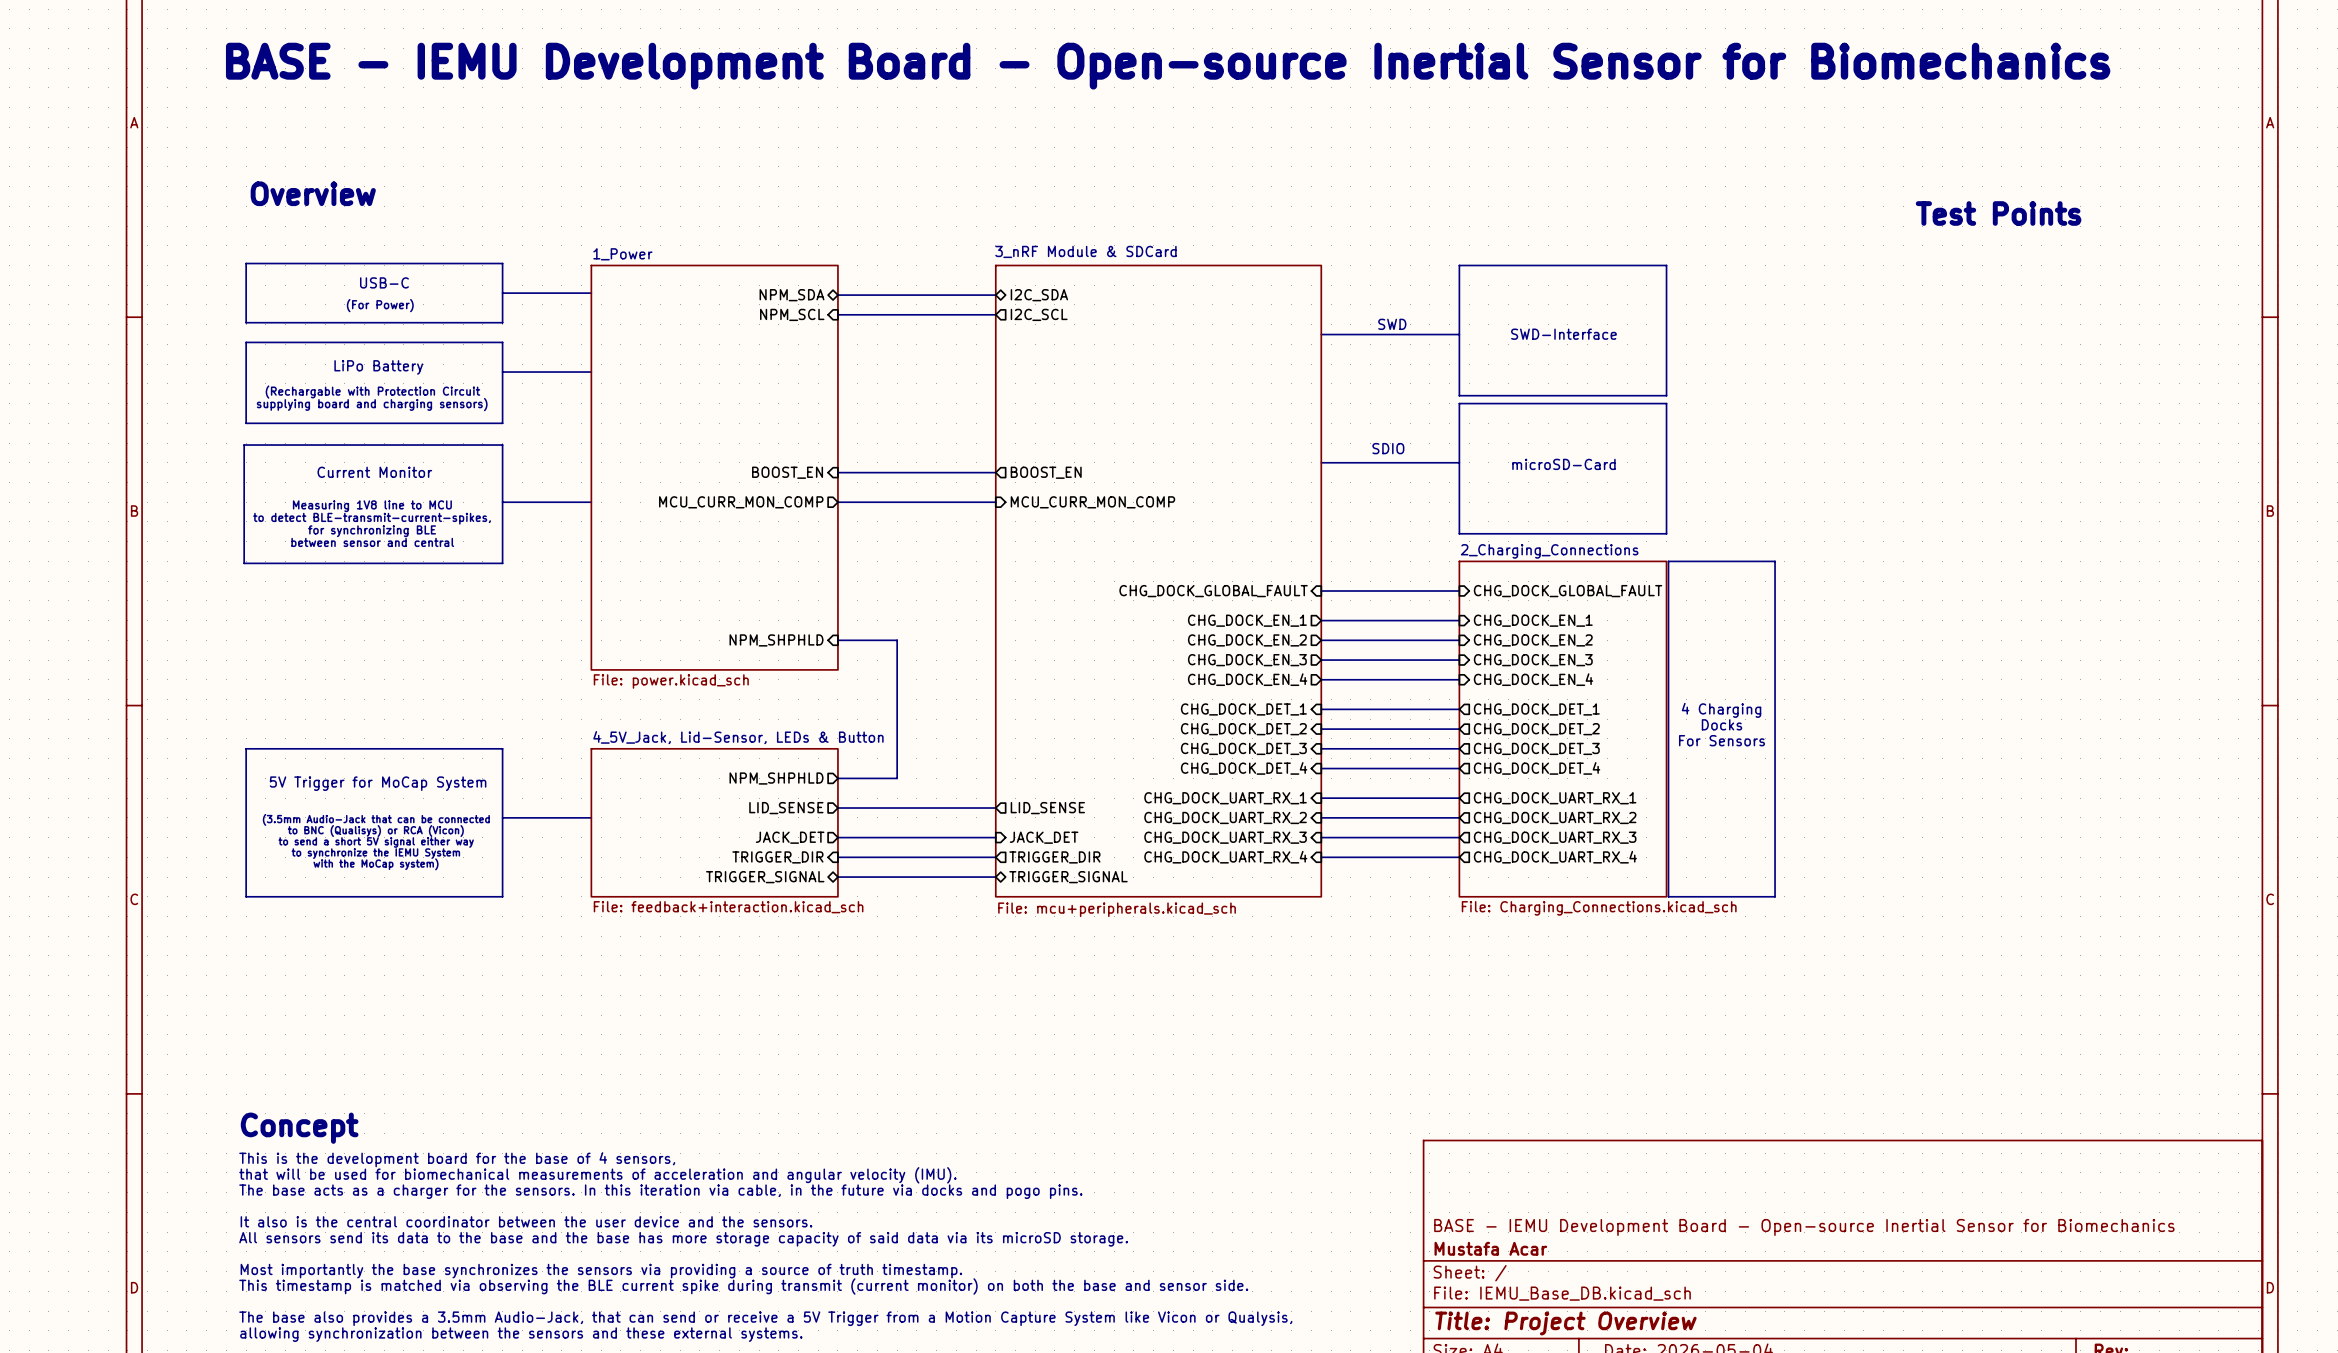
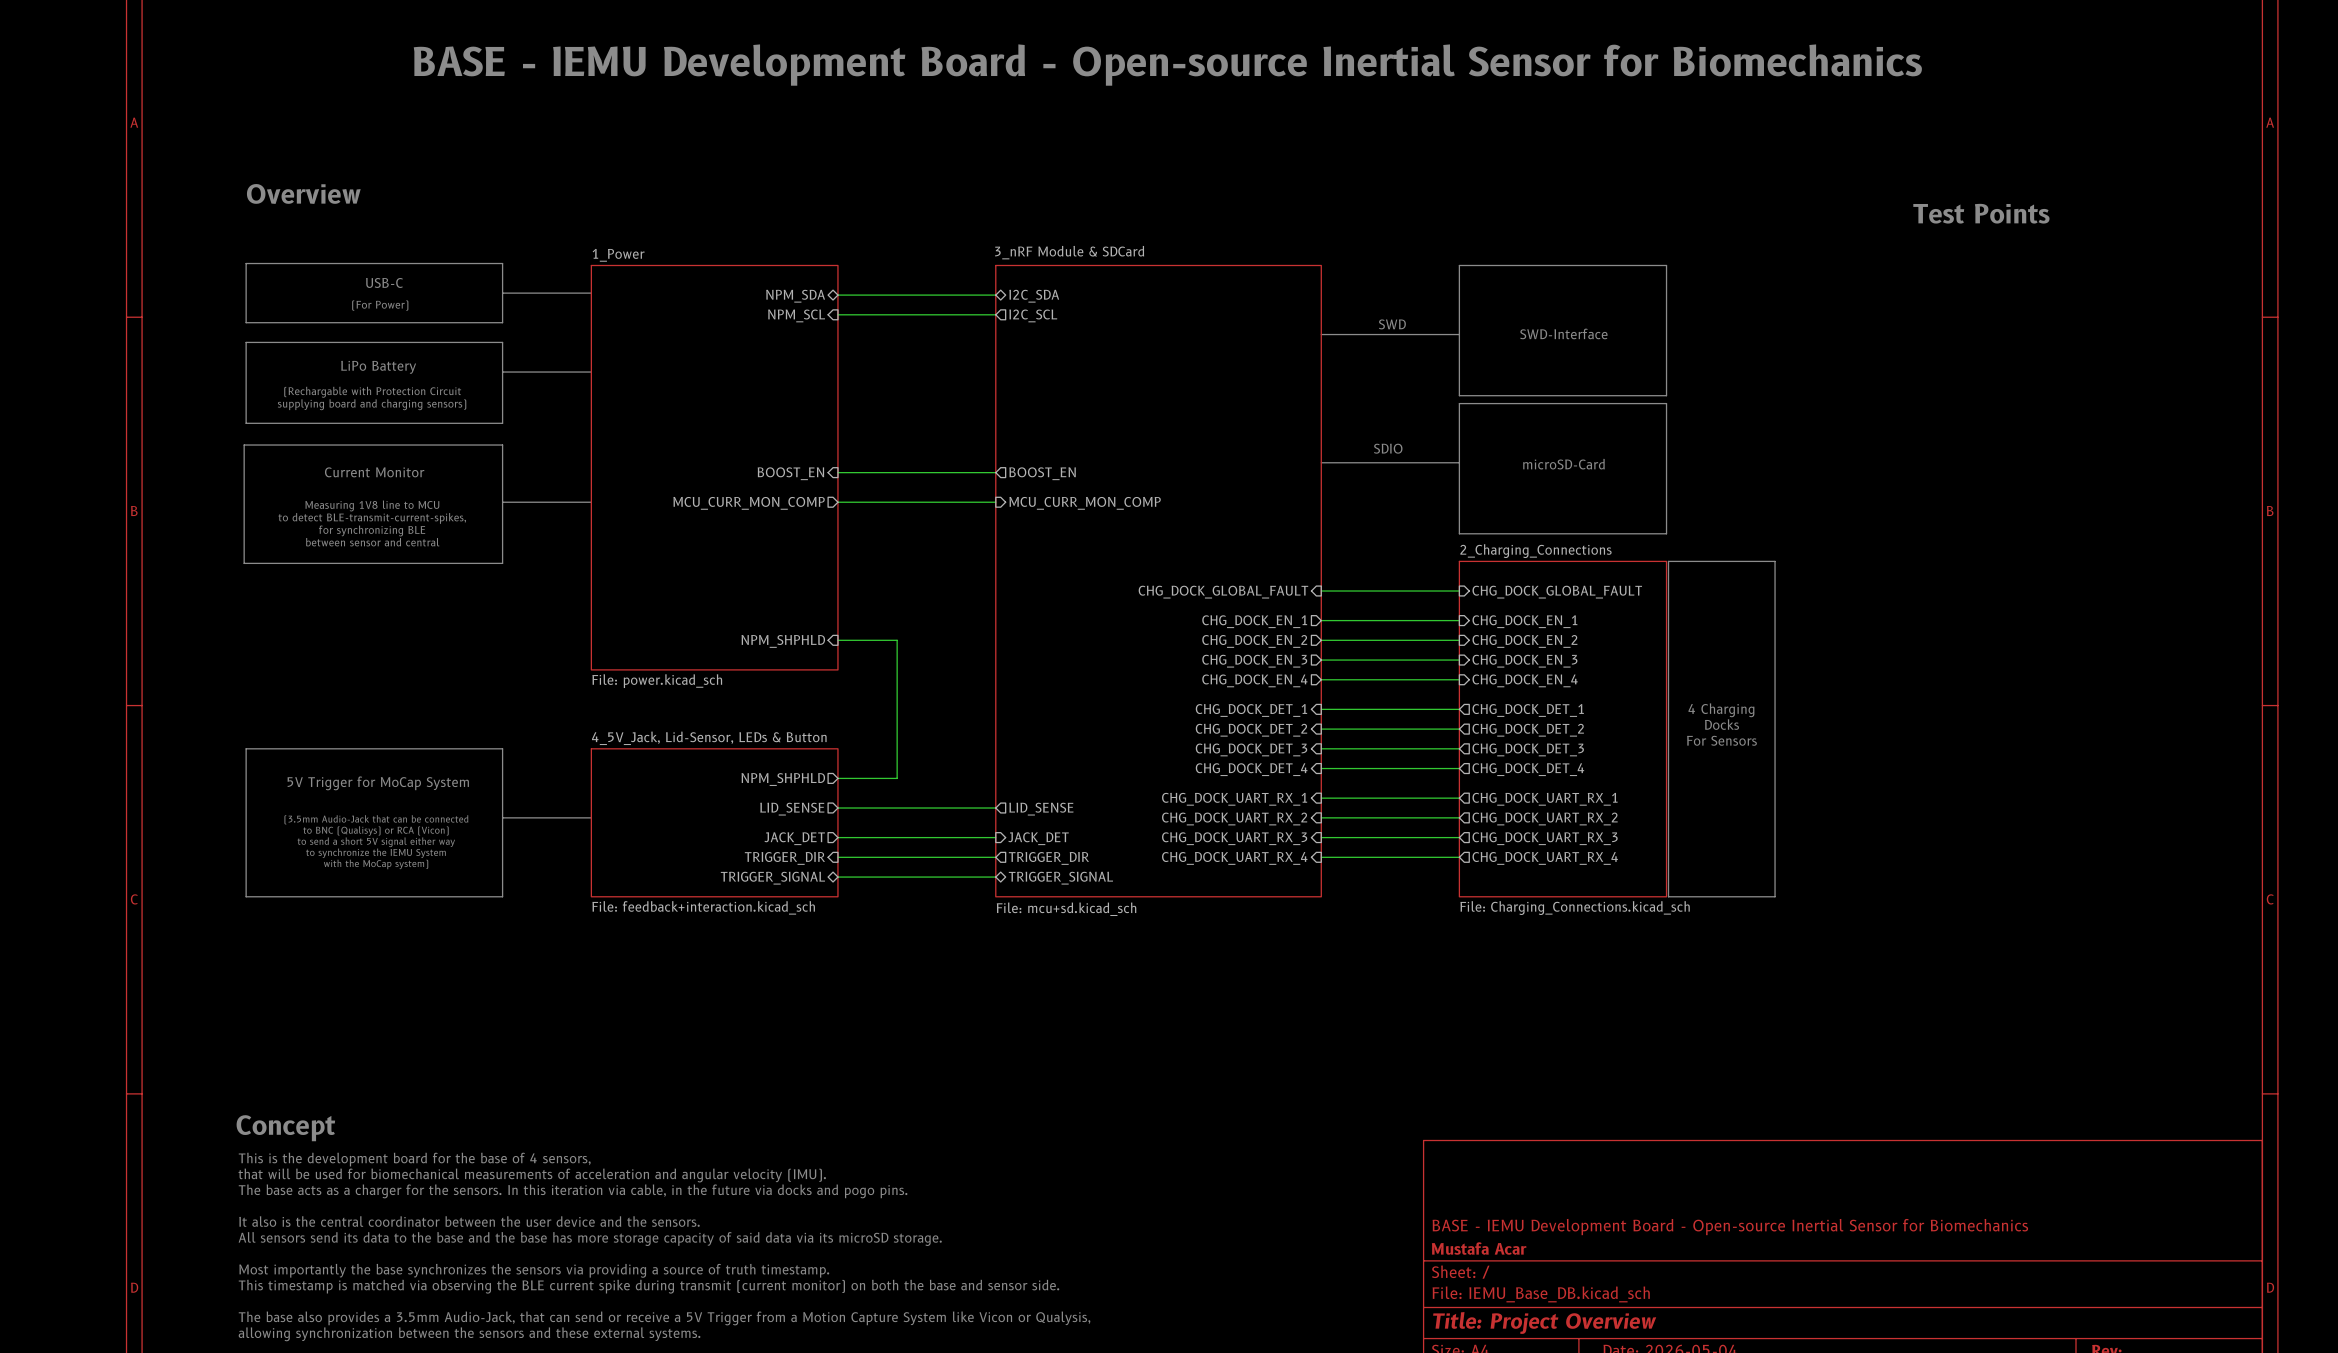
sheet 3_nRF Module & SDCard value: File: mcu+peripherals.kicad_sch (1117, 909) -> File: mcu+sd.kicad_sch (1066, 909)

